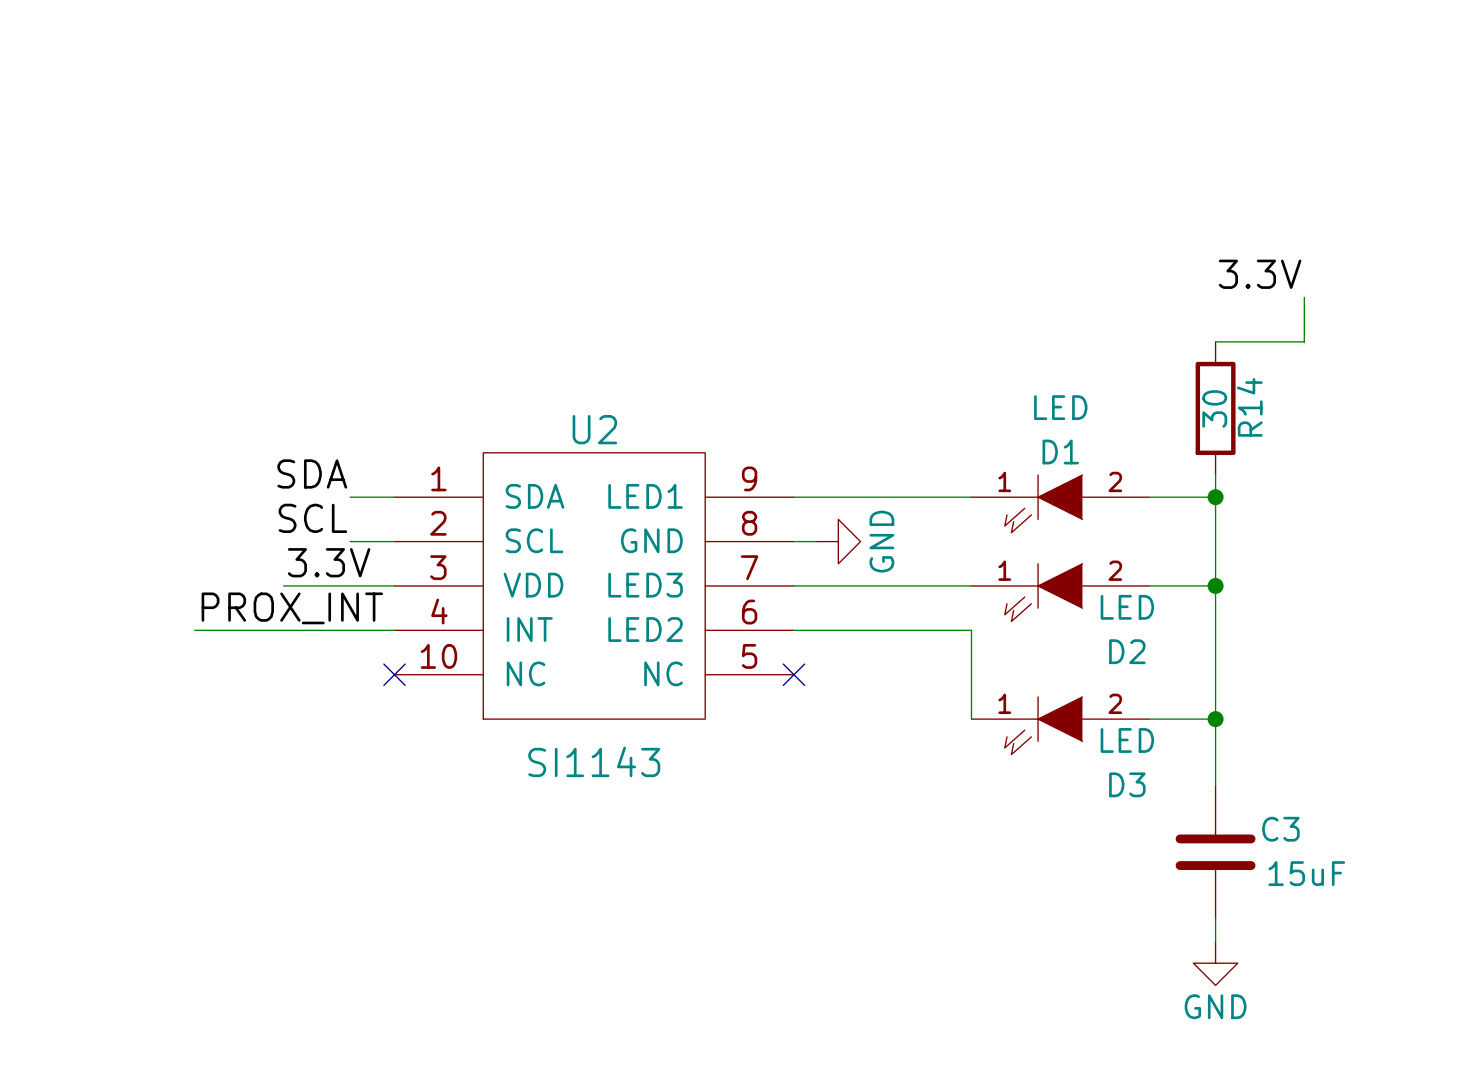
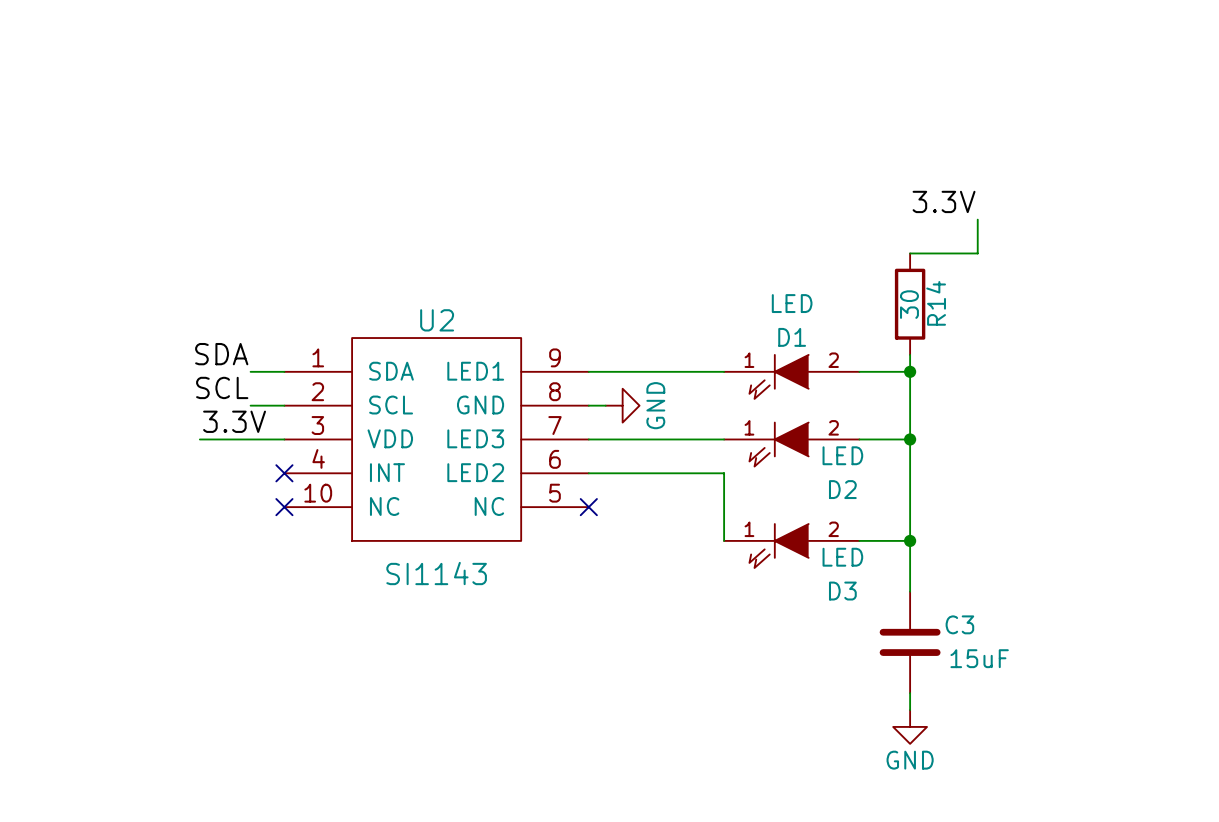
label: PROX_INT (292, 608) -> none
wire: (194, 630) (394, 630) -> none
no-connect mark: none -> (284, 473)

